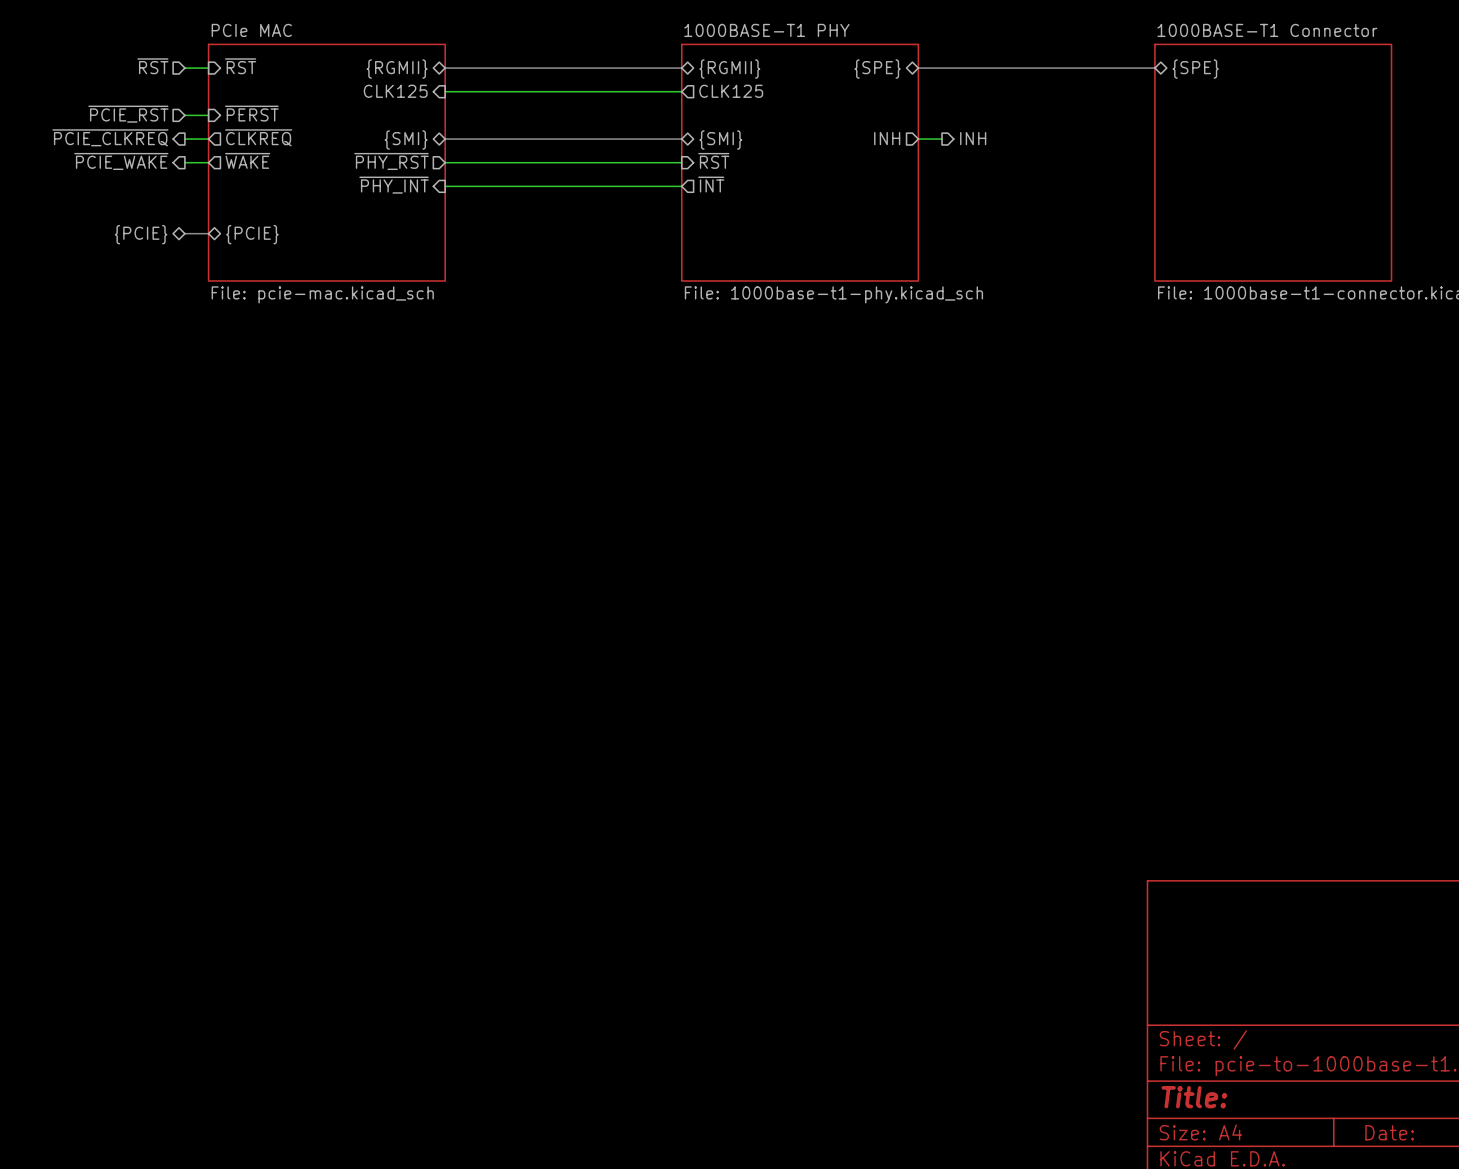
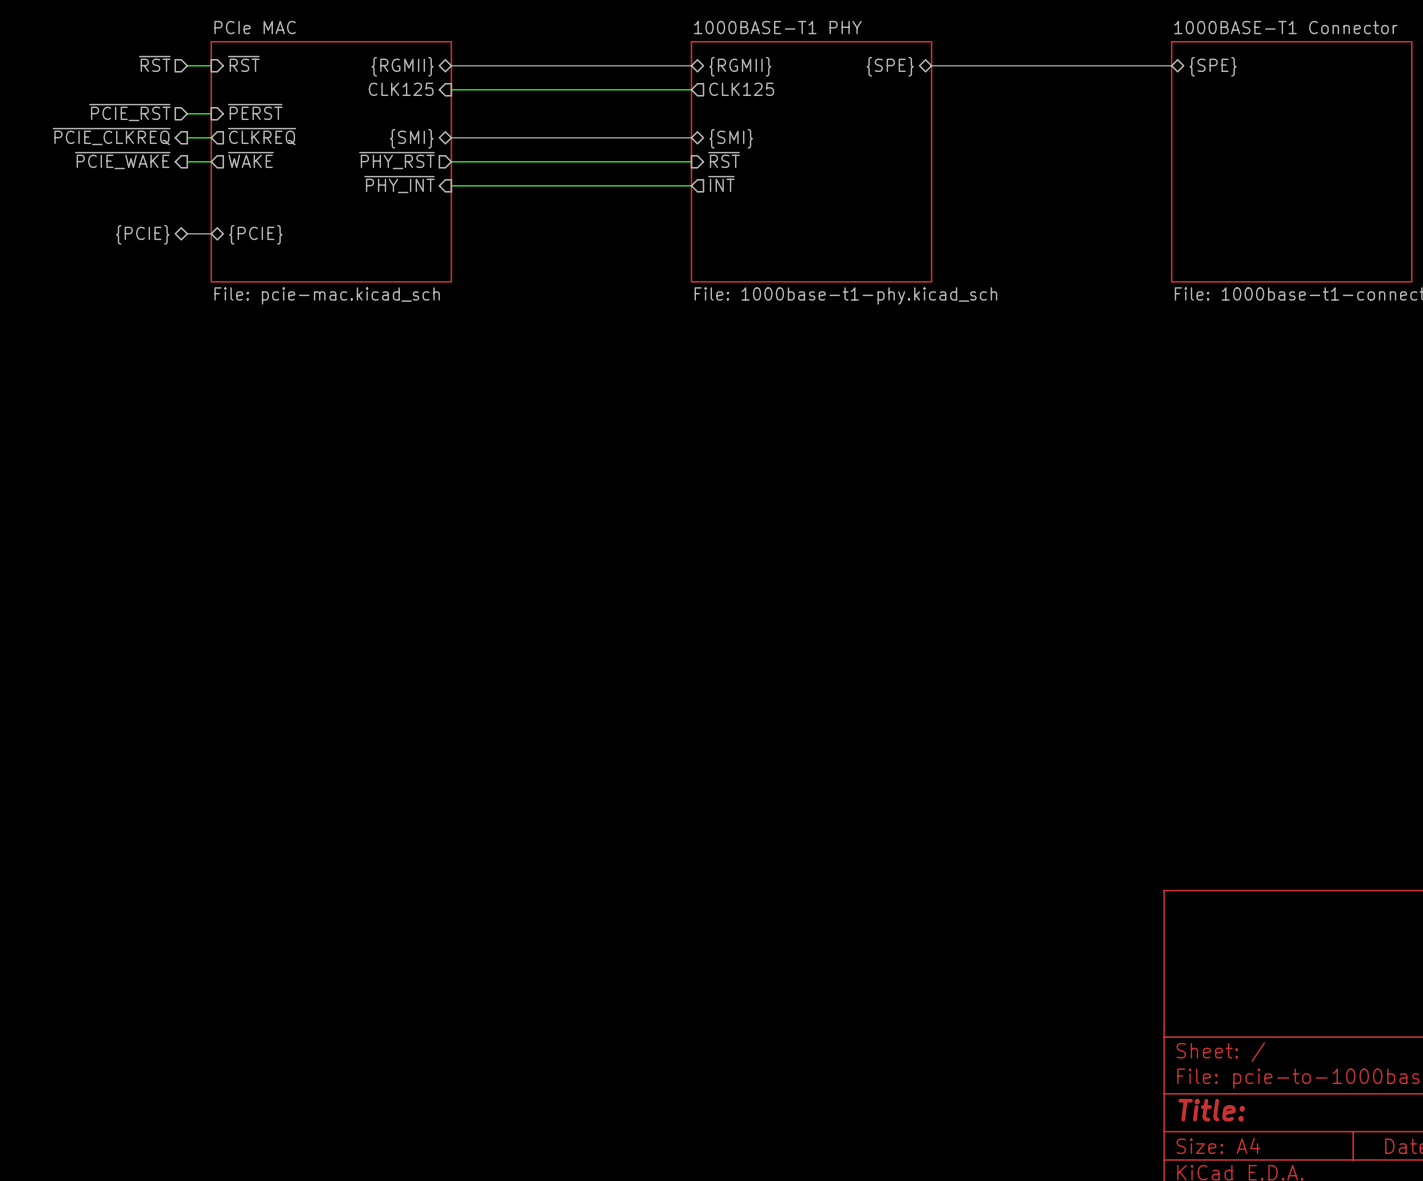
sheet pin: INH (887, 138) -> none
hierarchical label: INH (973, 138) -> none
wire: (918, 139) (942, 139) -> none

